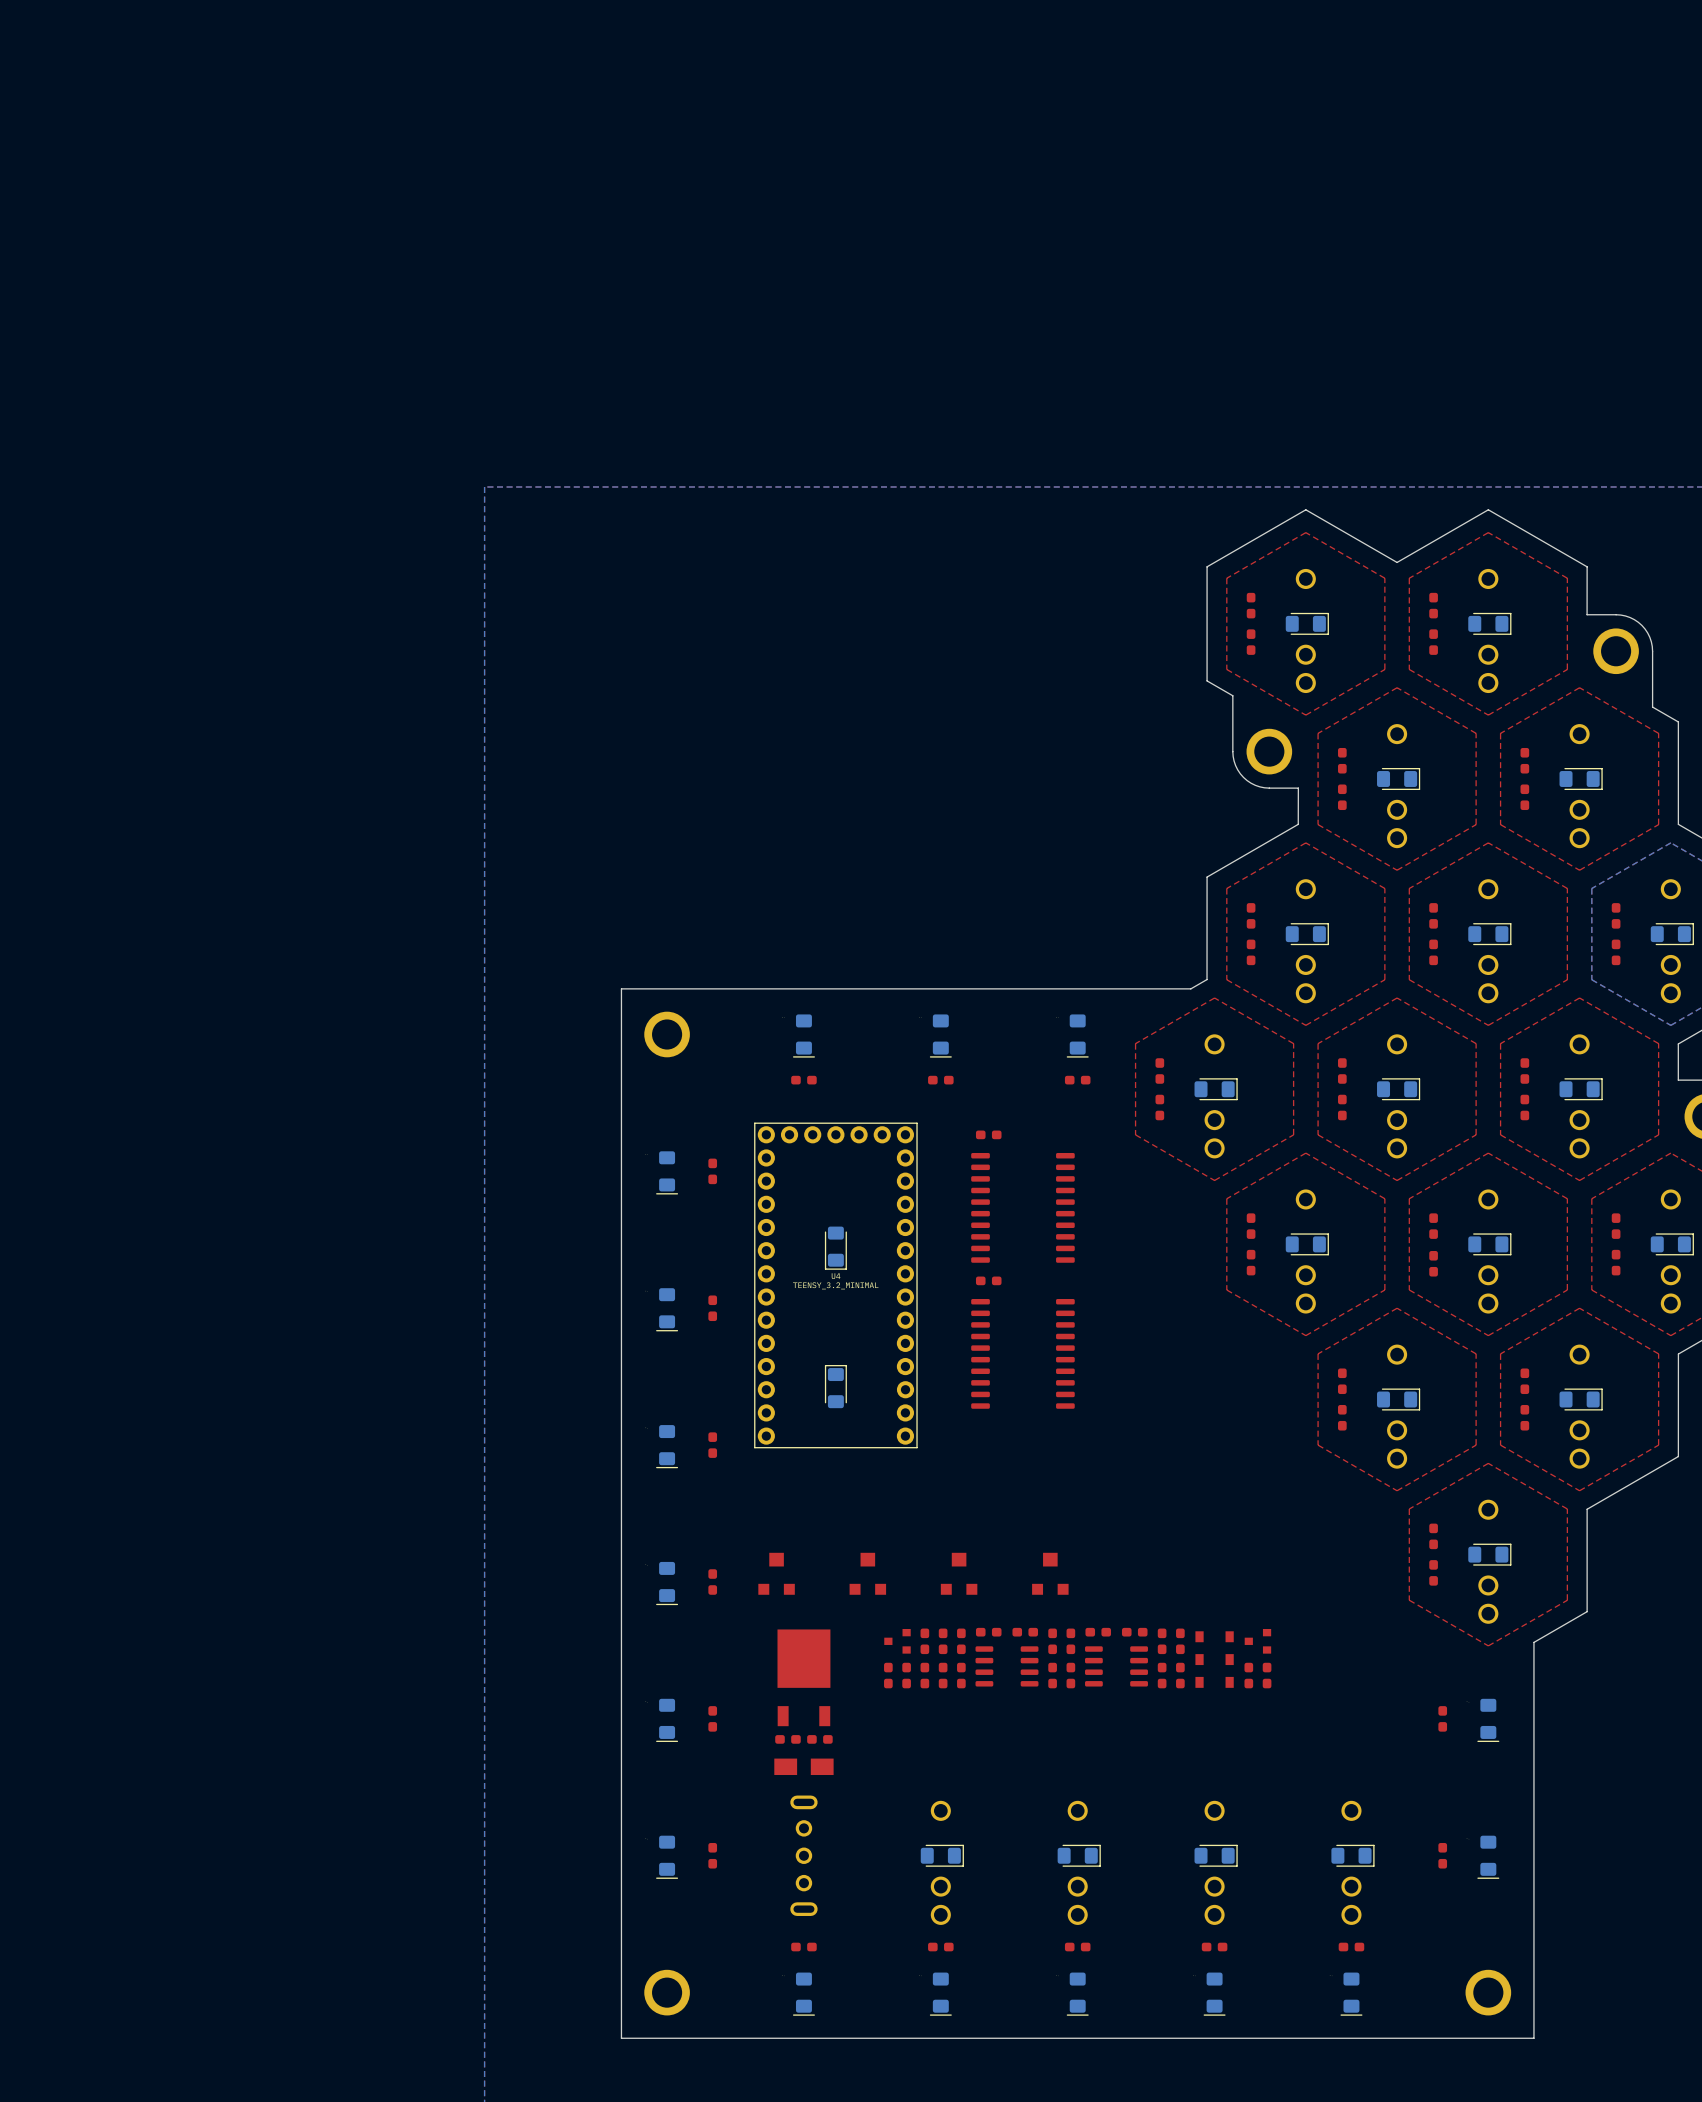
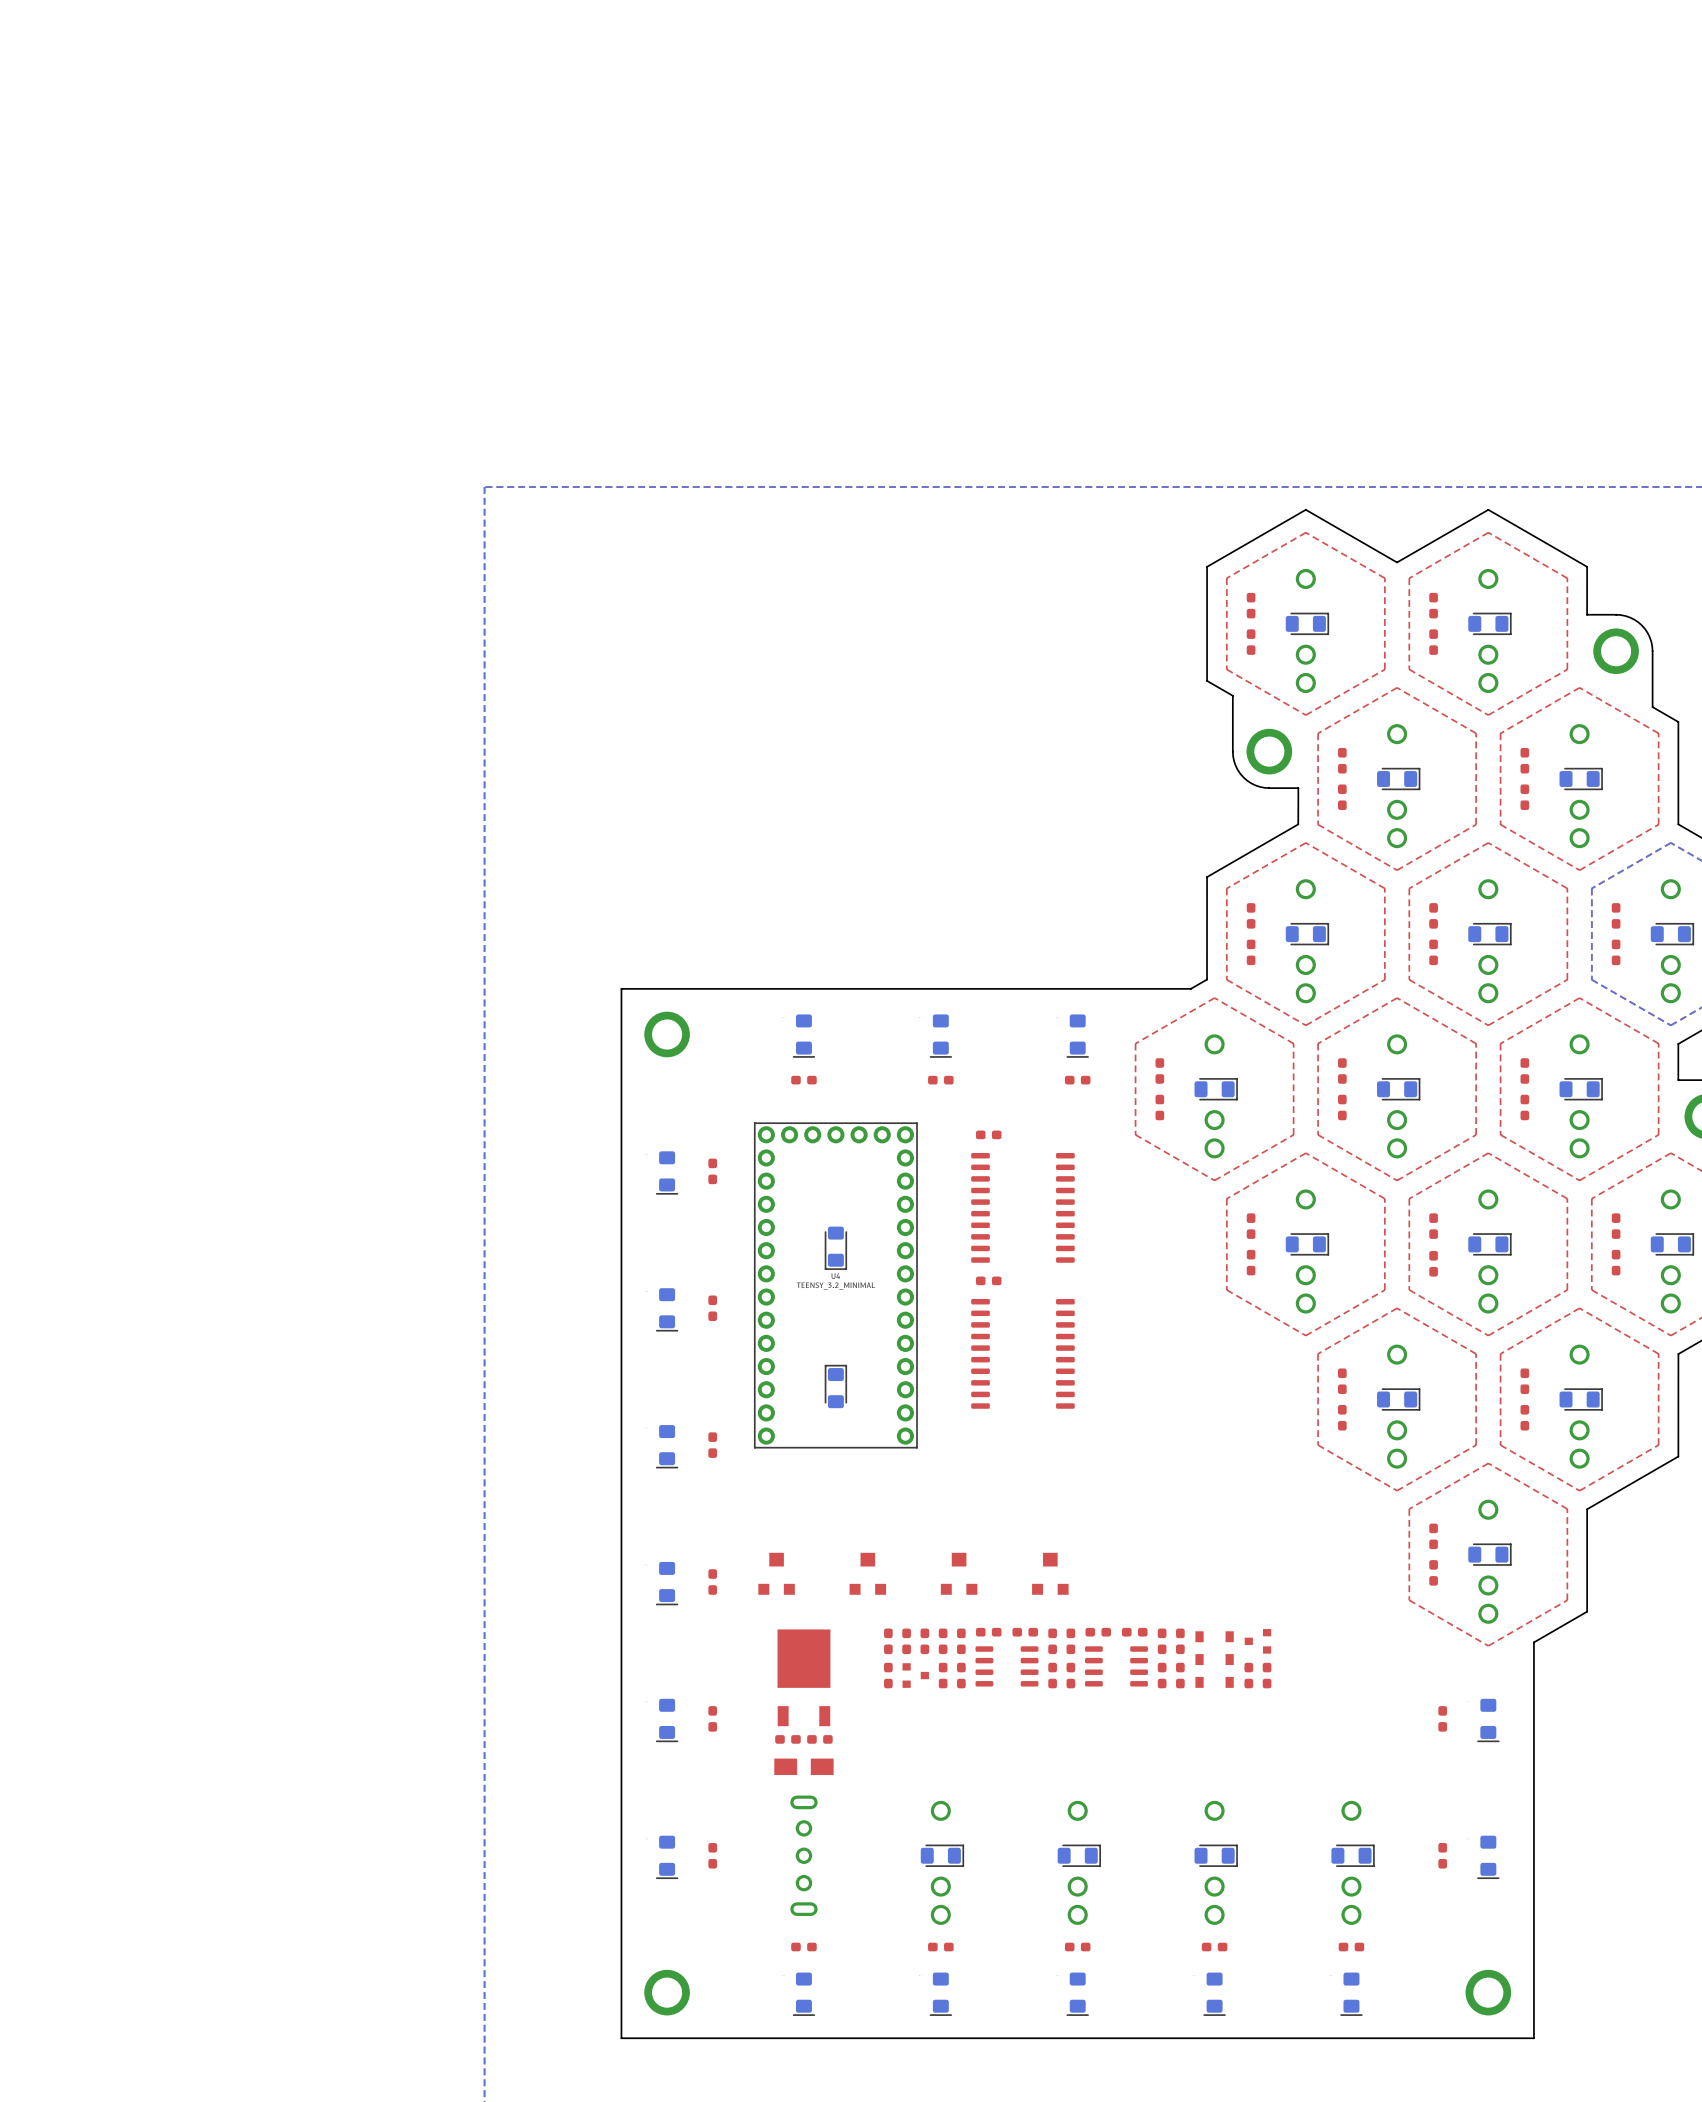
part: none -> (888, 1641)
part rotation: 0° (897, 1641) -> 180° (915, 1675)
part position: (897, 1641) -> (915, 1675)
part: none -> (906, 1641)
part: (906, 1675) -> none
part: (924, 1675) -> none

